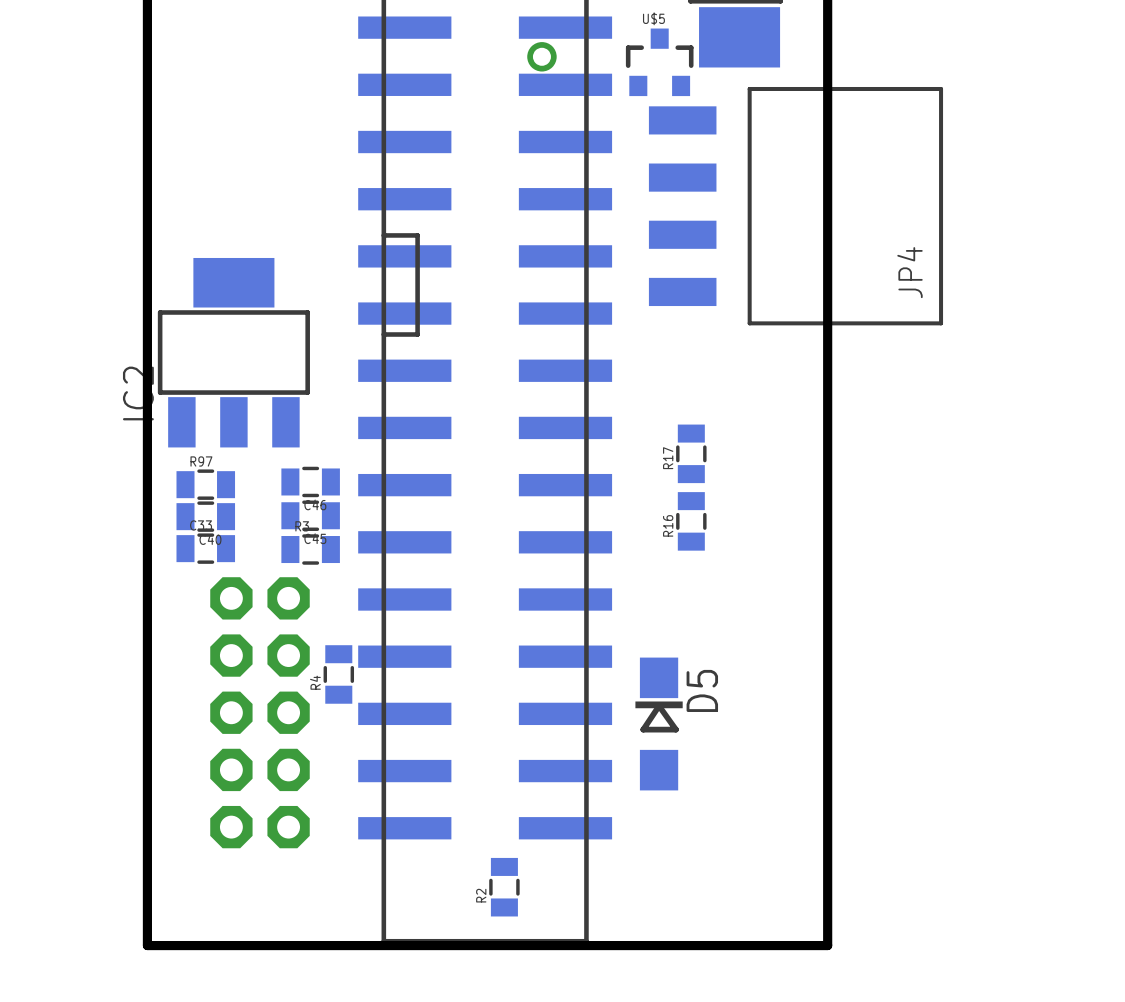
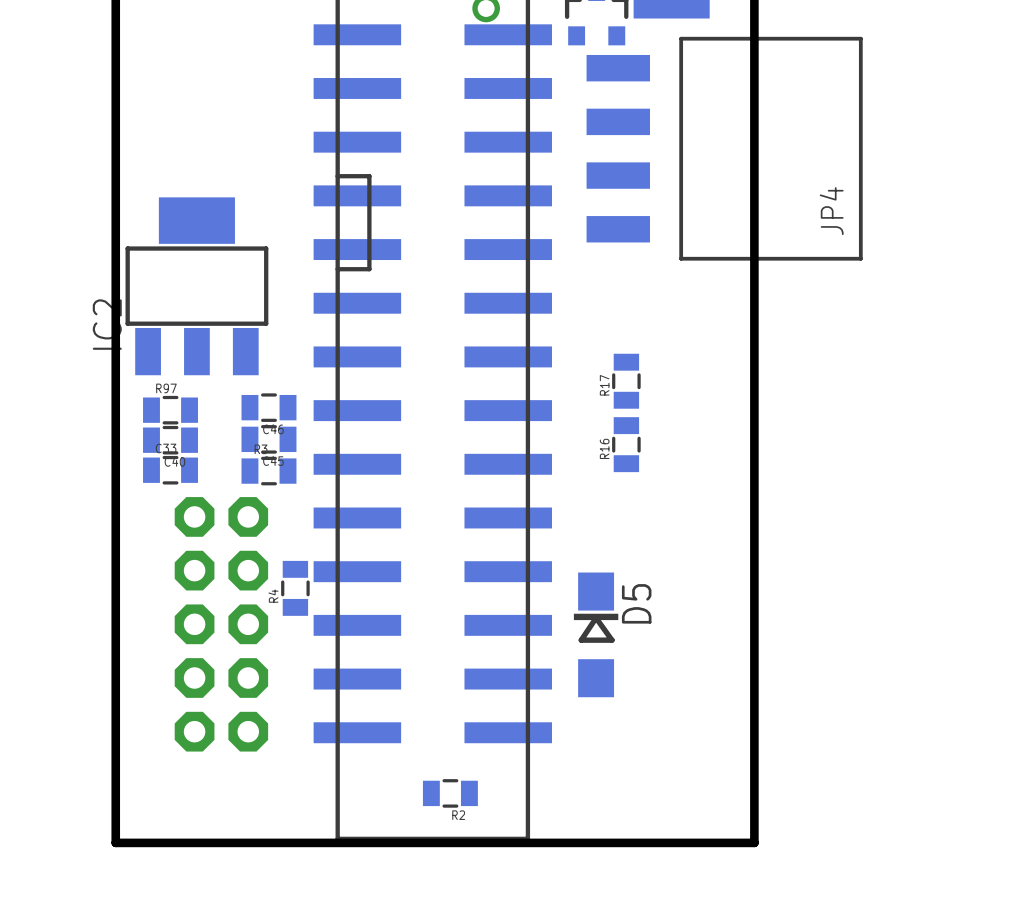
R2 rotation: 0° (504, 887) -> 90° clockwise (450, 793)

